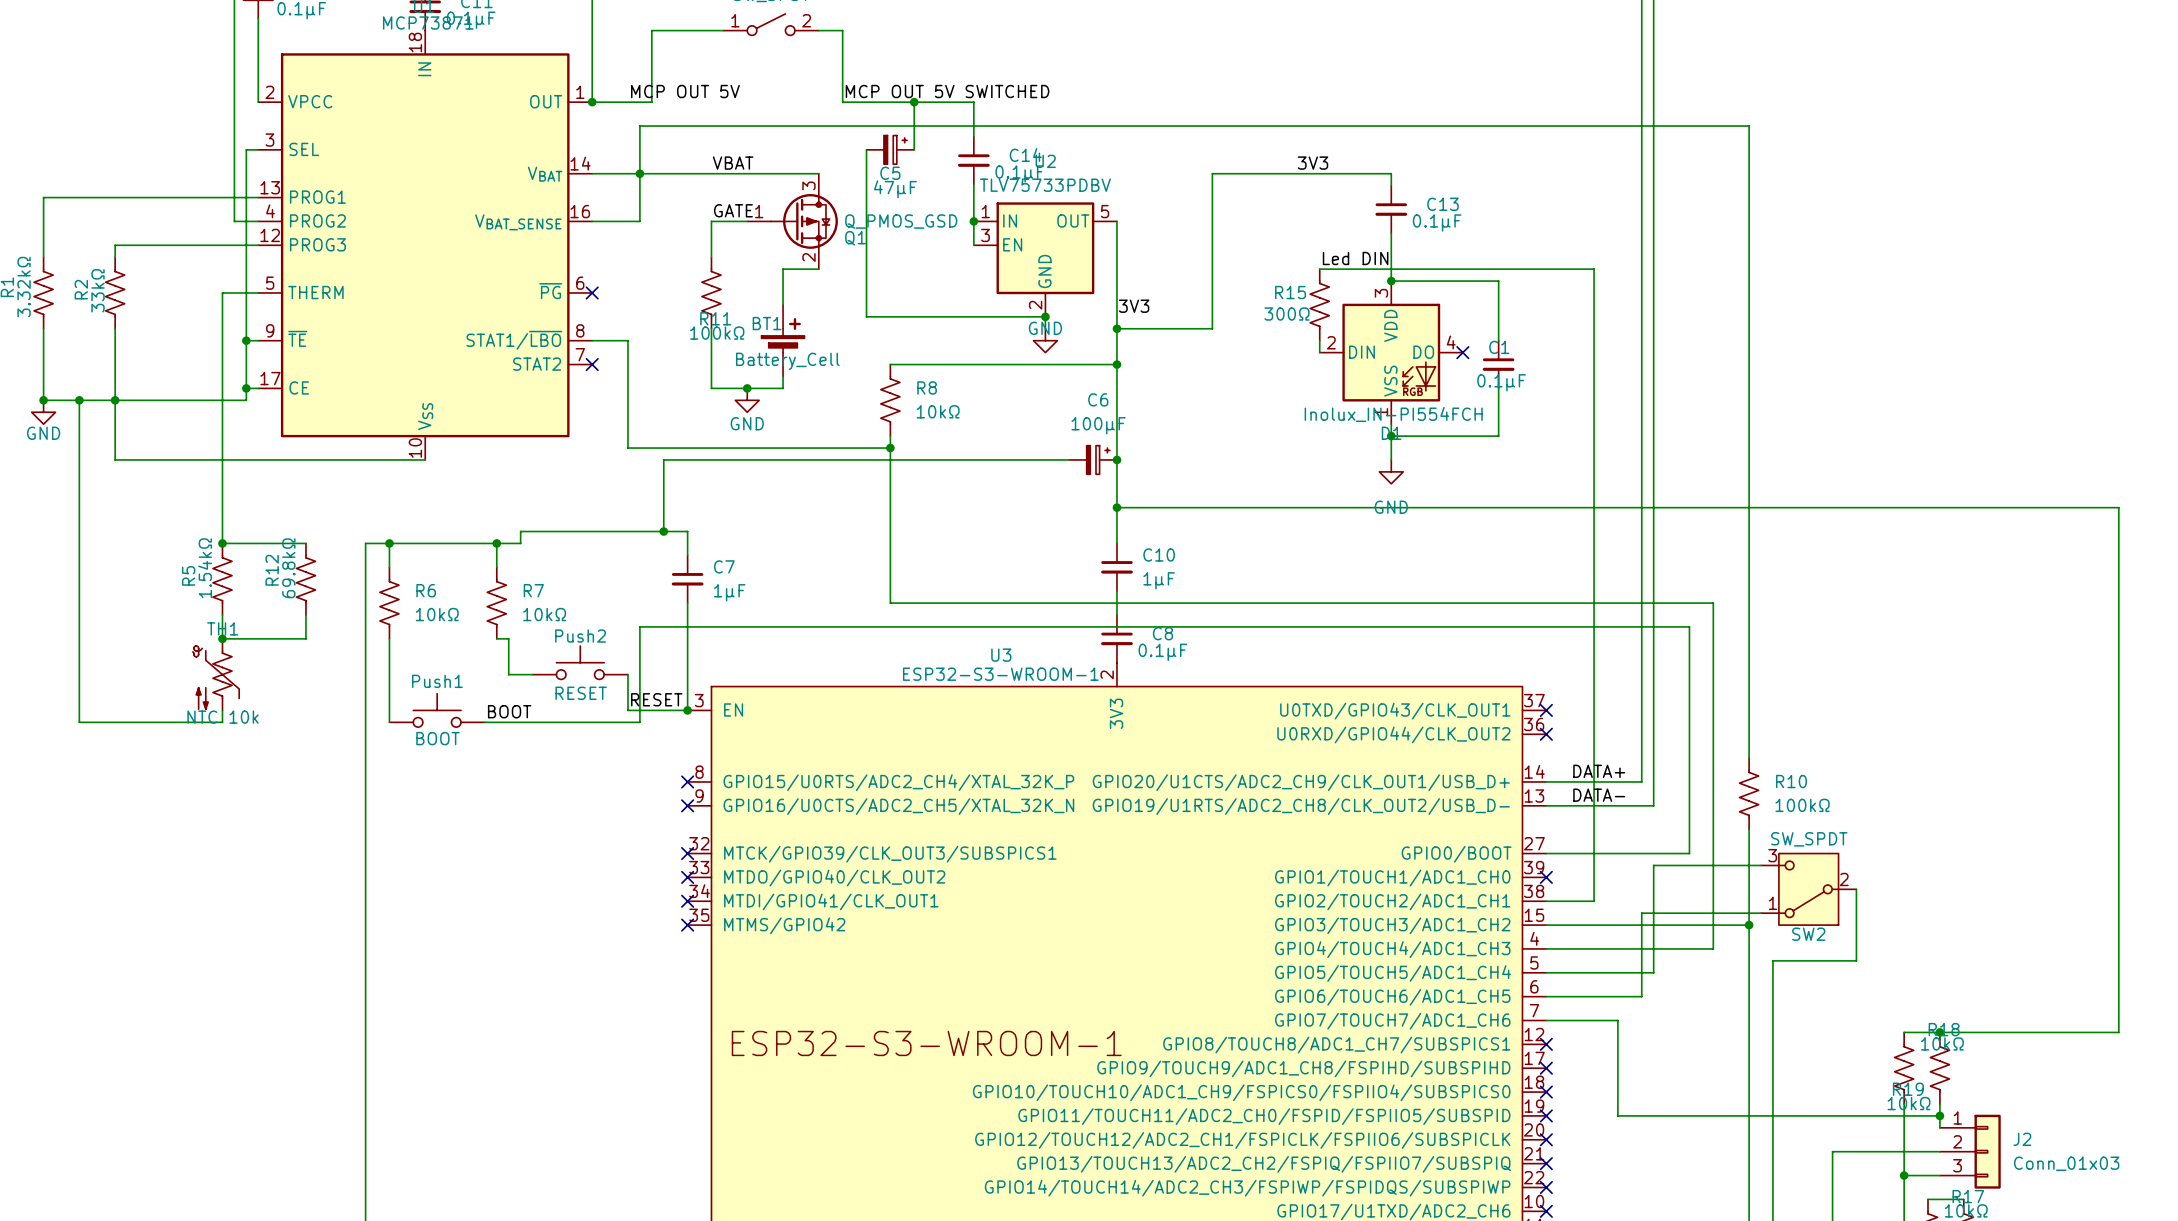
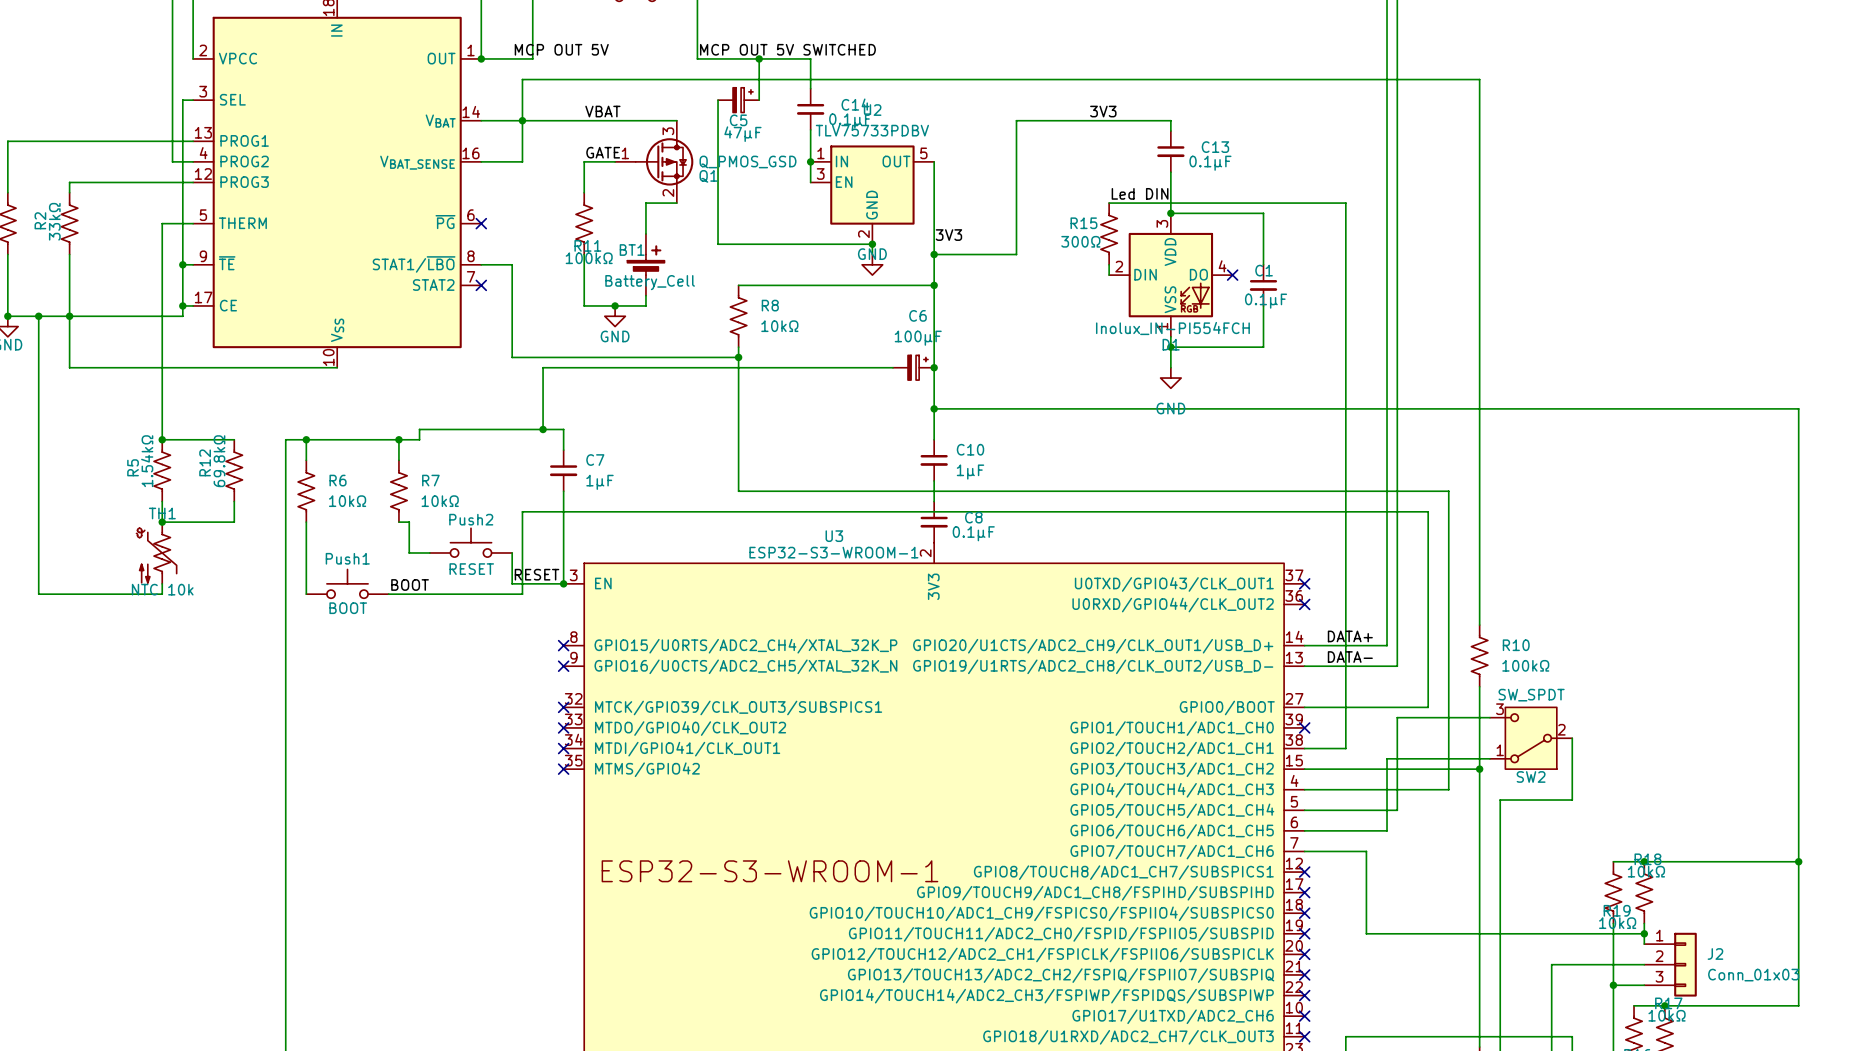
wire: none -> (1798, 861) (1798, 1005) (1664, 1005)
junction: none -> (1798, 861)
junction: none -> (1664, 1005)

